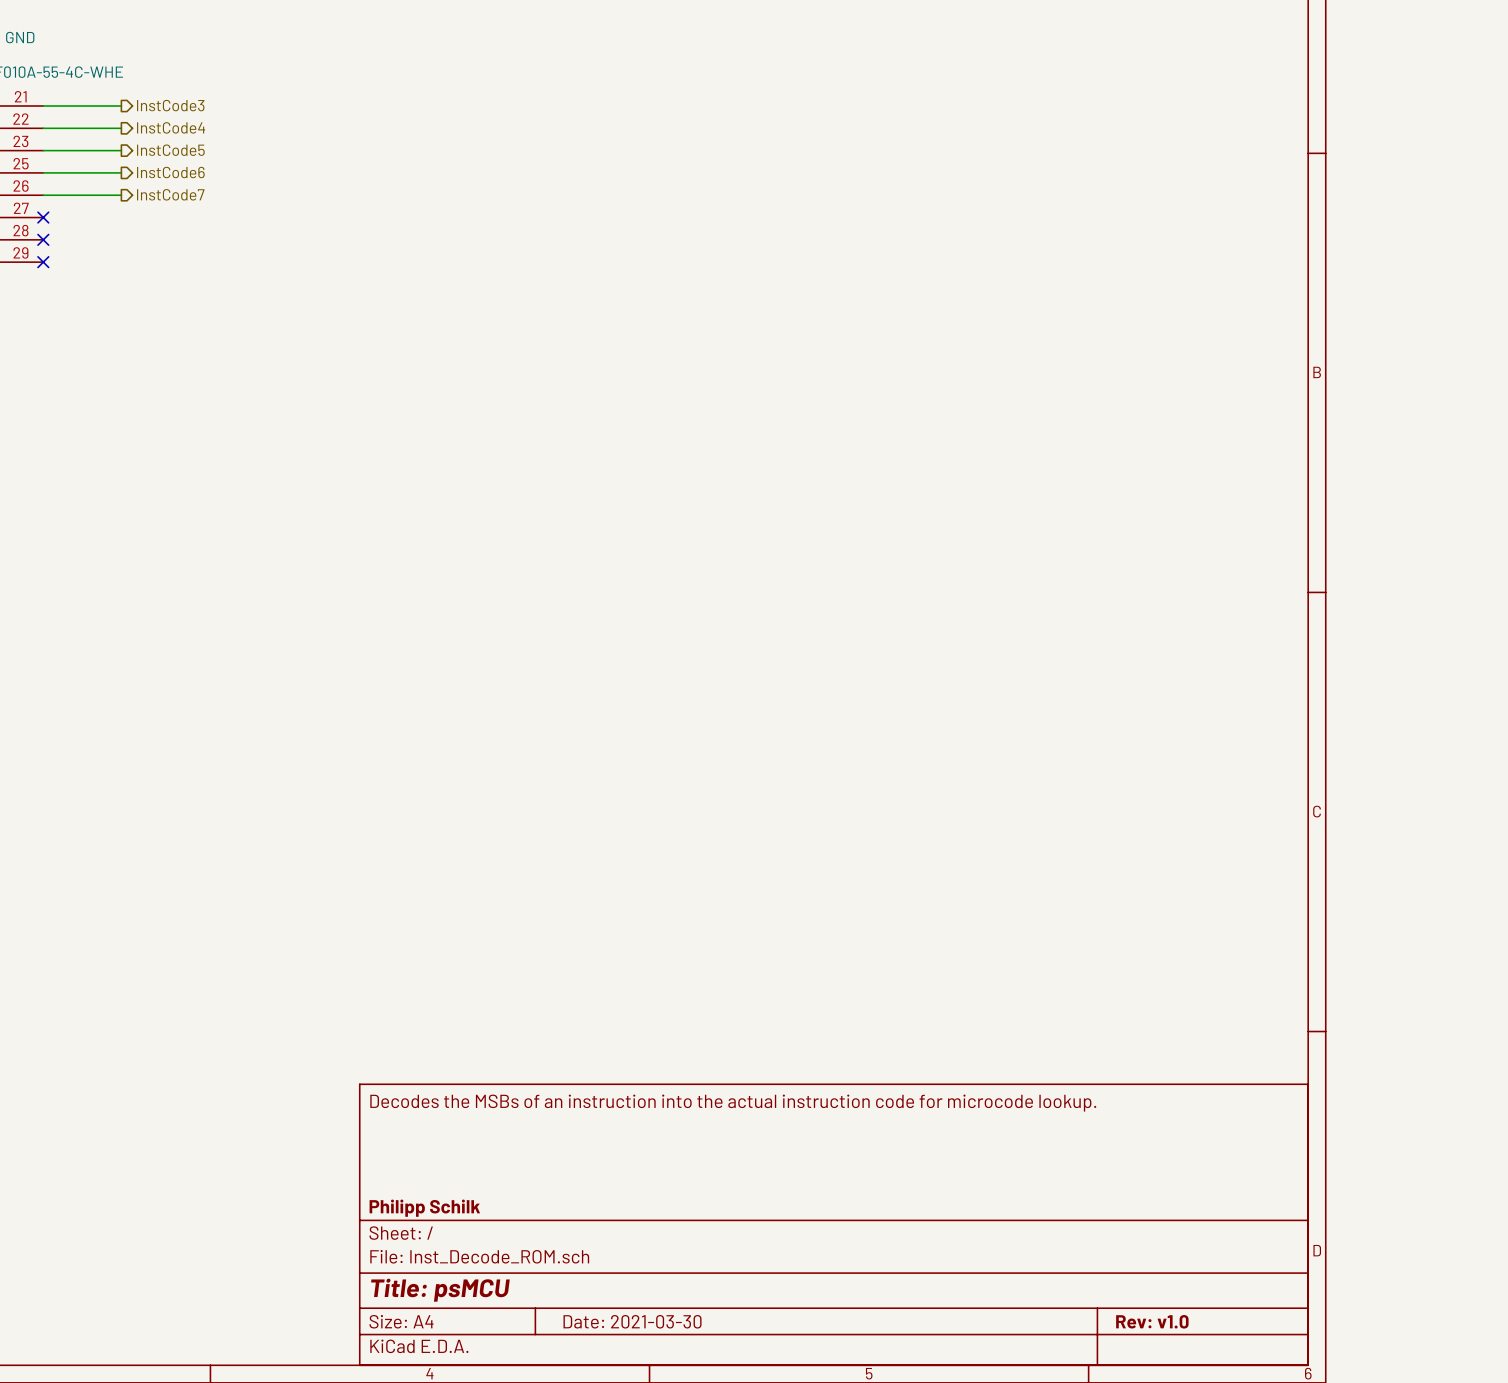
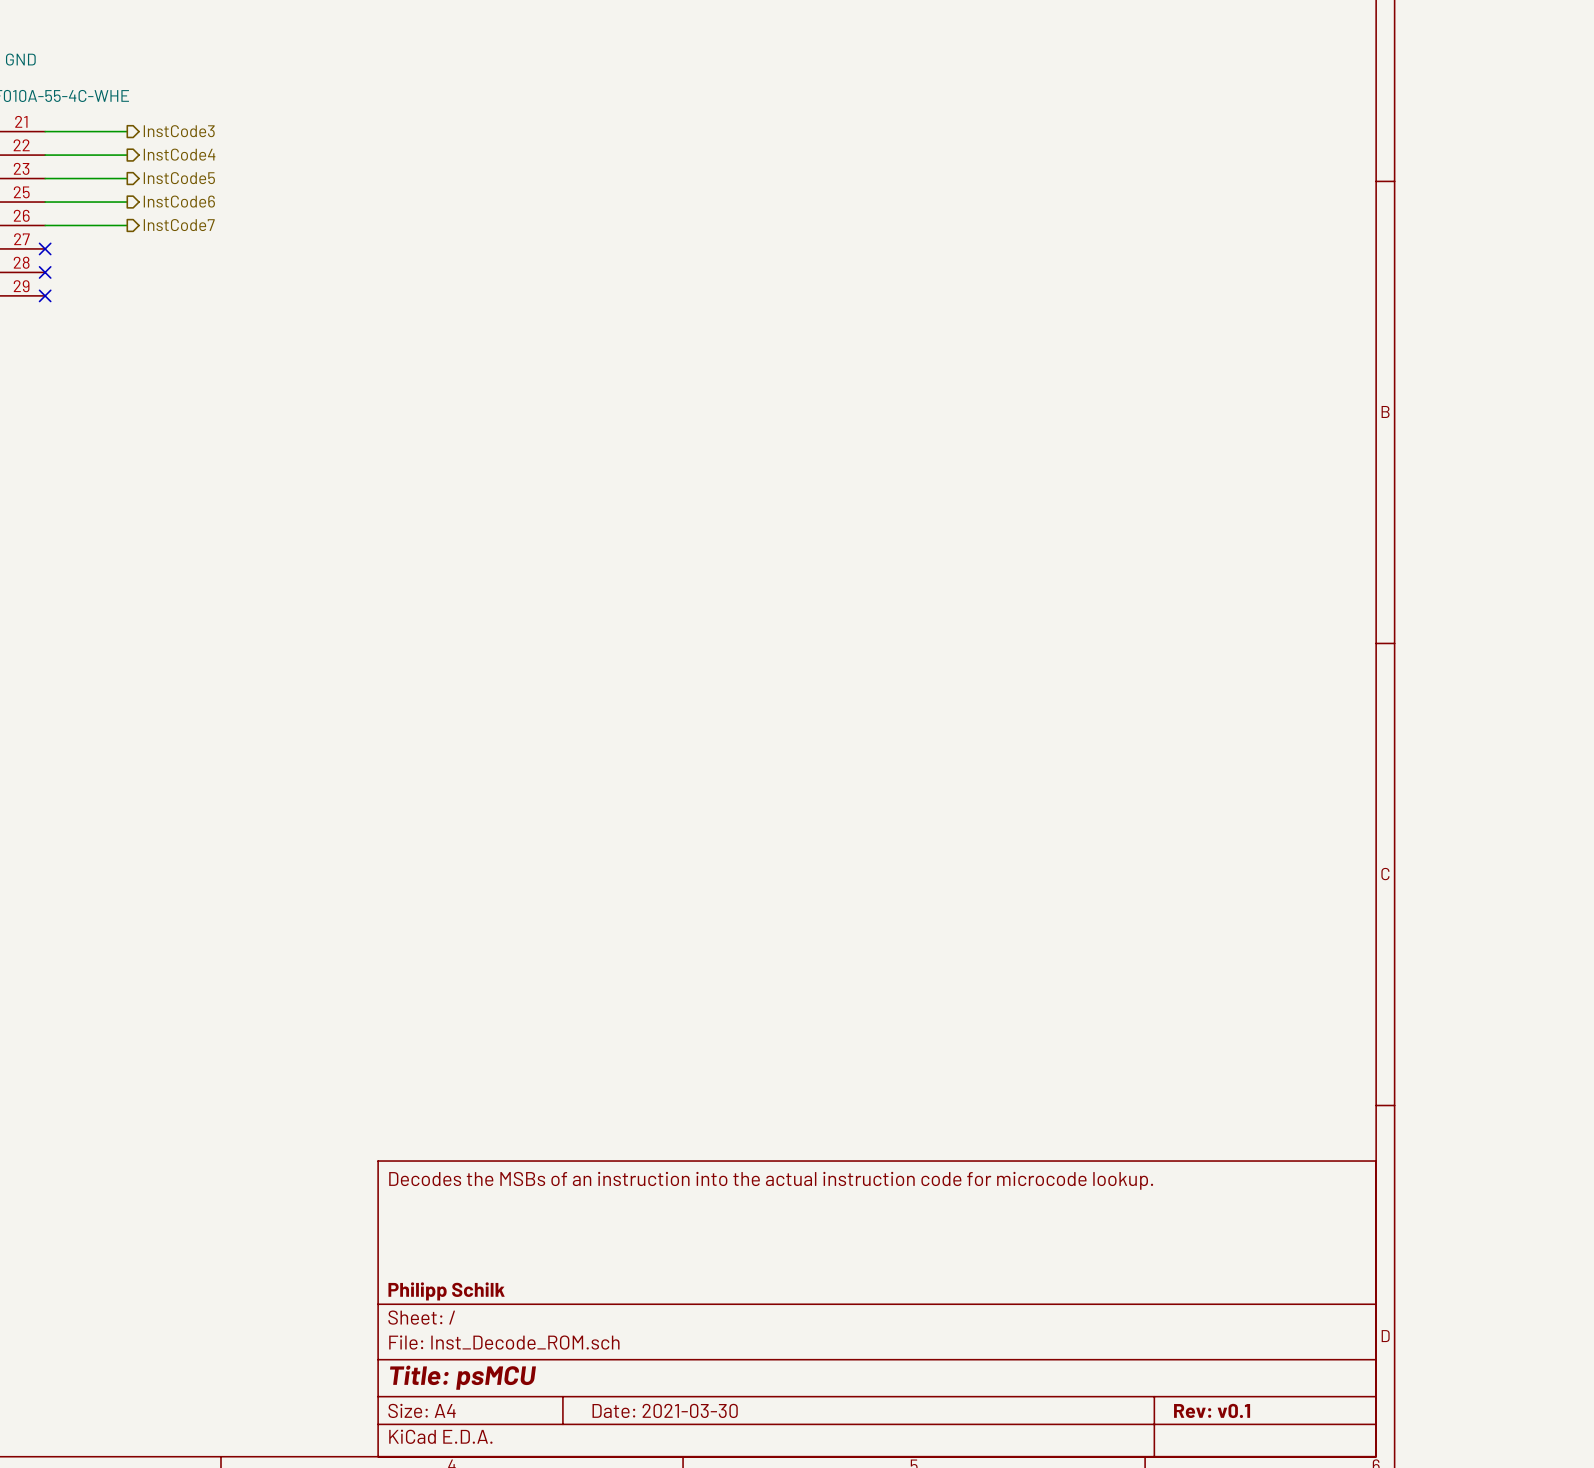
title block: Rev: v1.0 (1152, 1321) -> Rev: v0.1 (1212, 1410)

